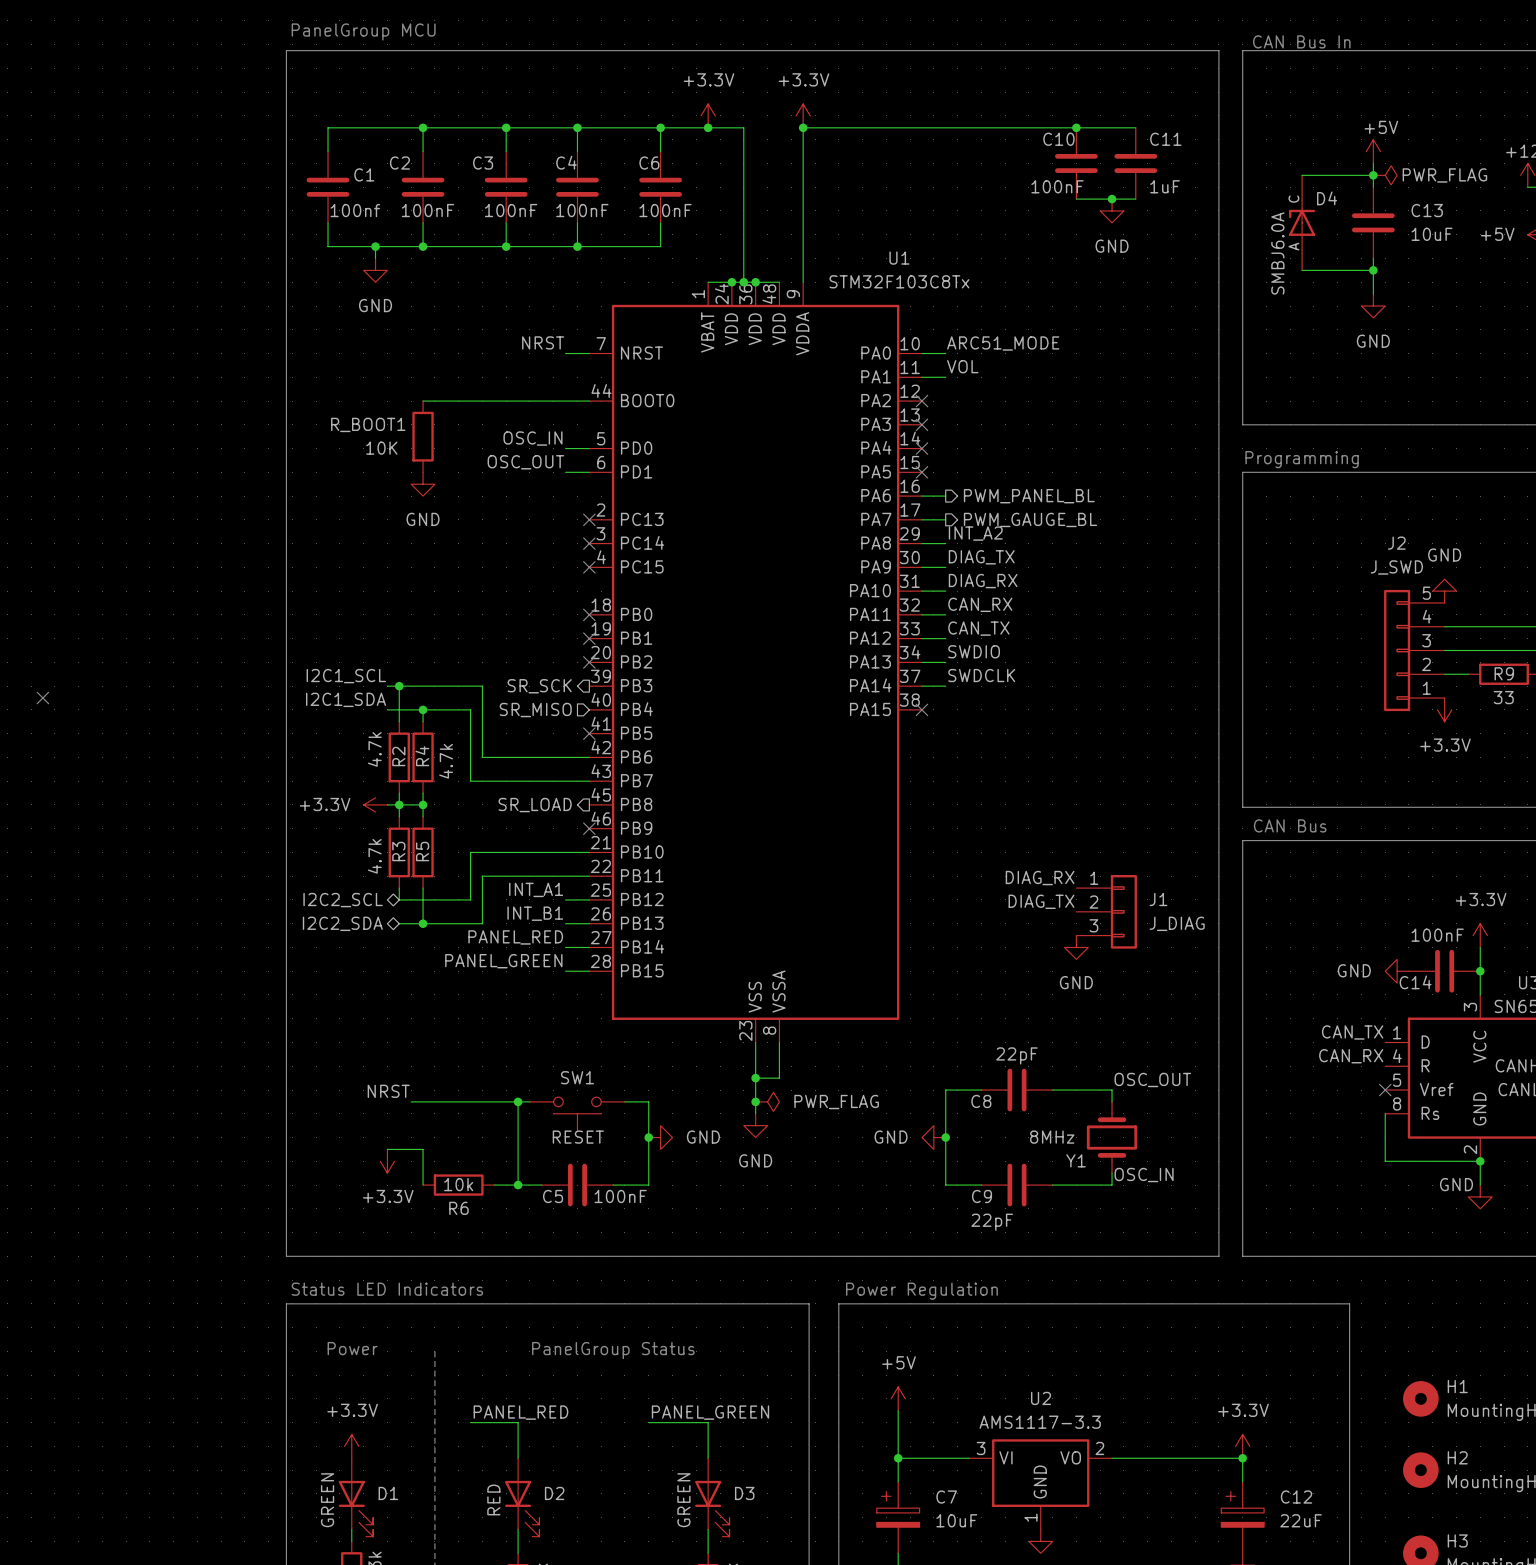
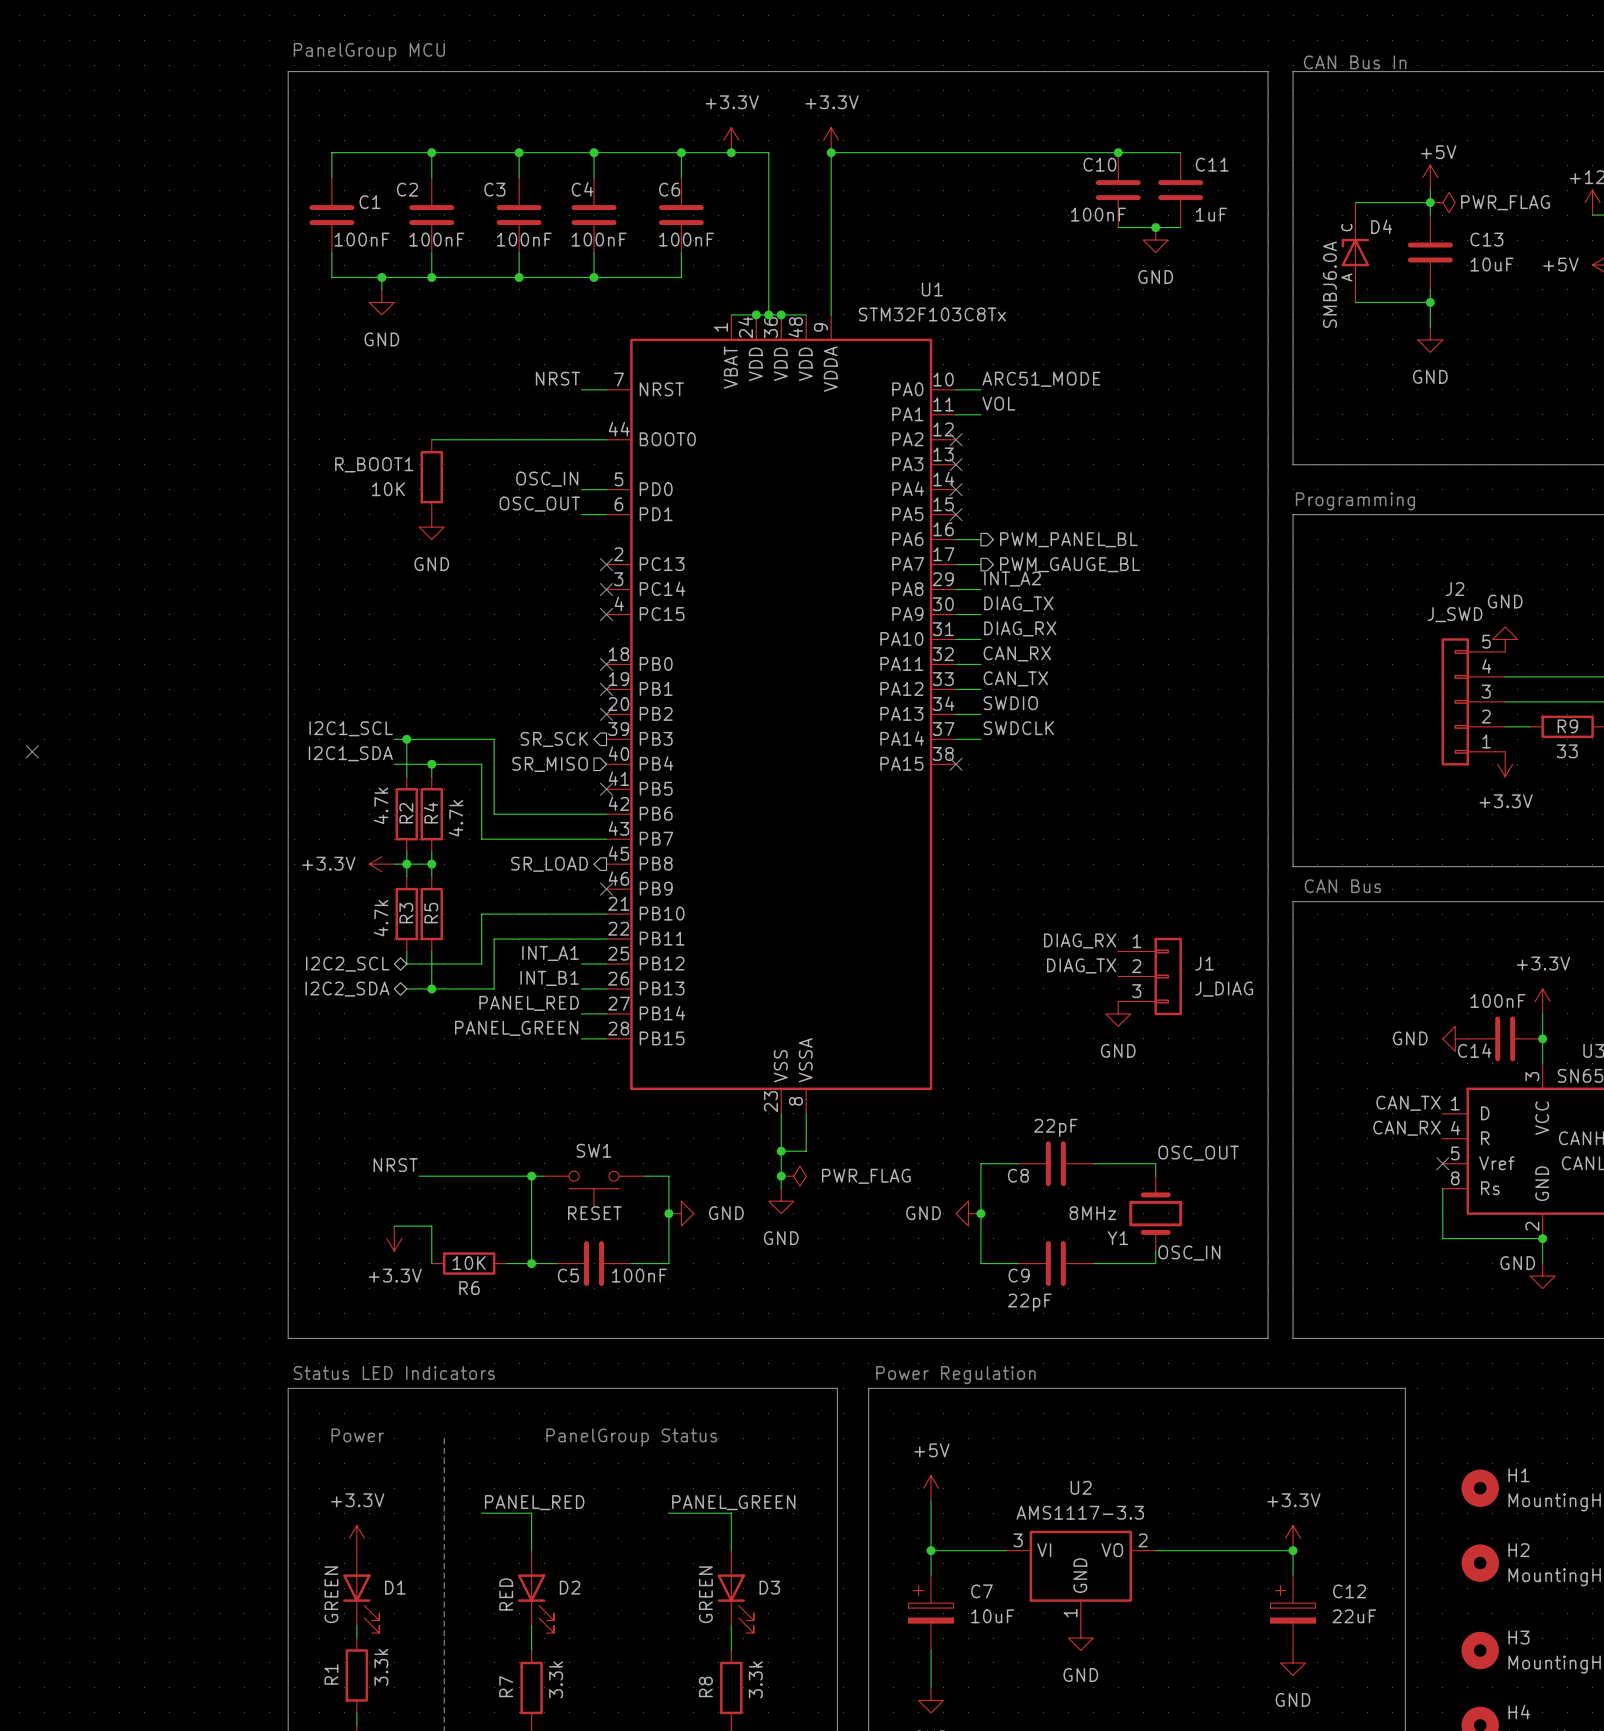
C1 value: 100nf (355, 210) -> 100nF (362, 239)
R6 value: 10k (458, 1184) -> 10K (469, 1263)

